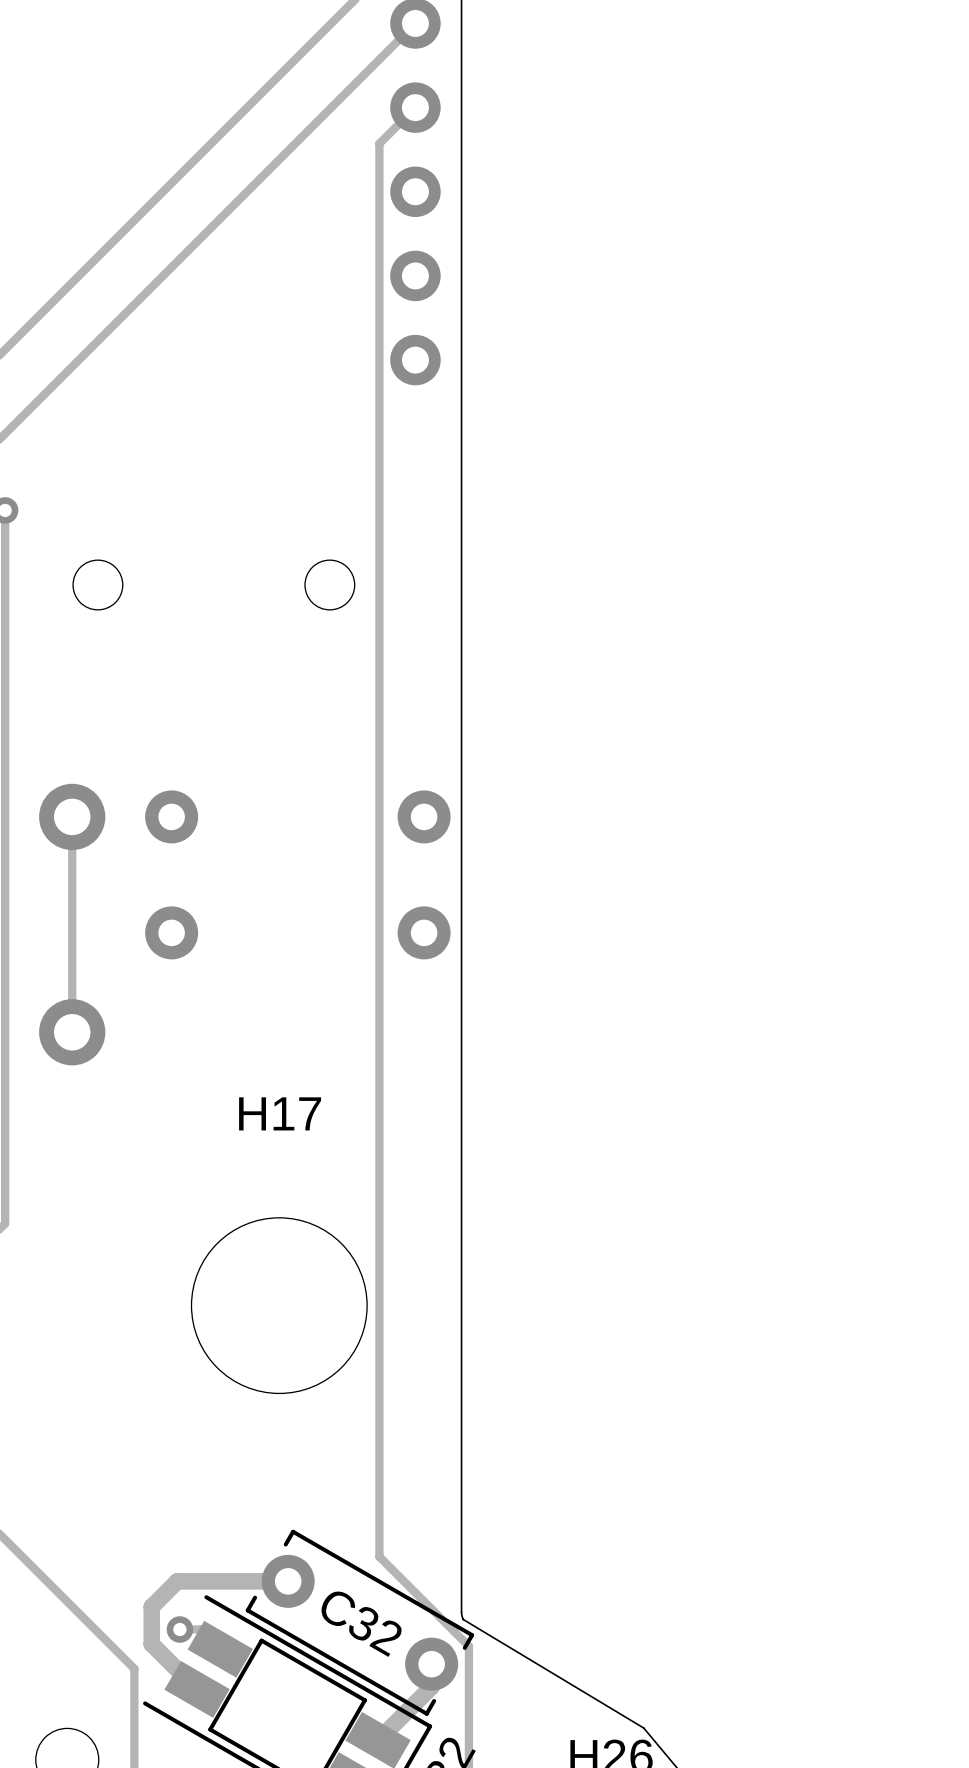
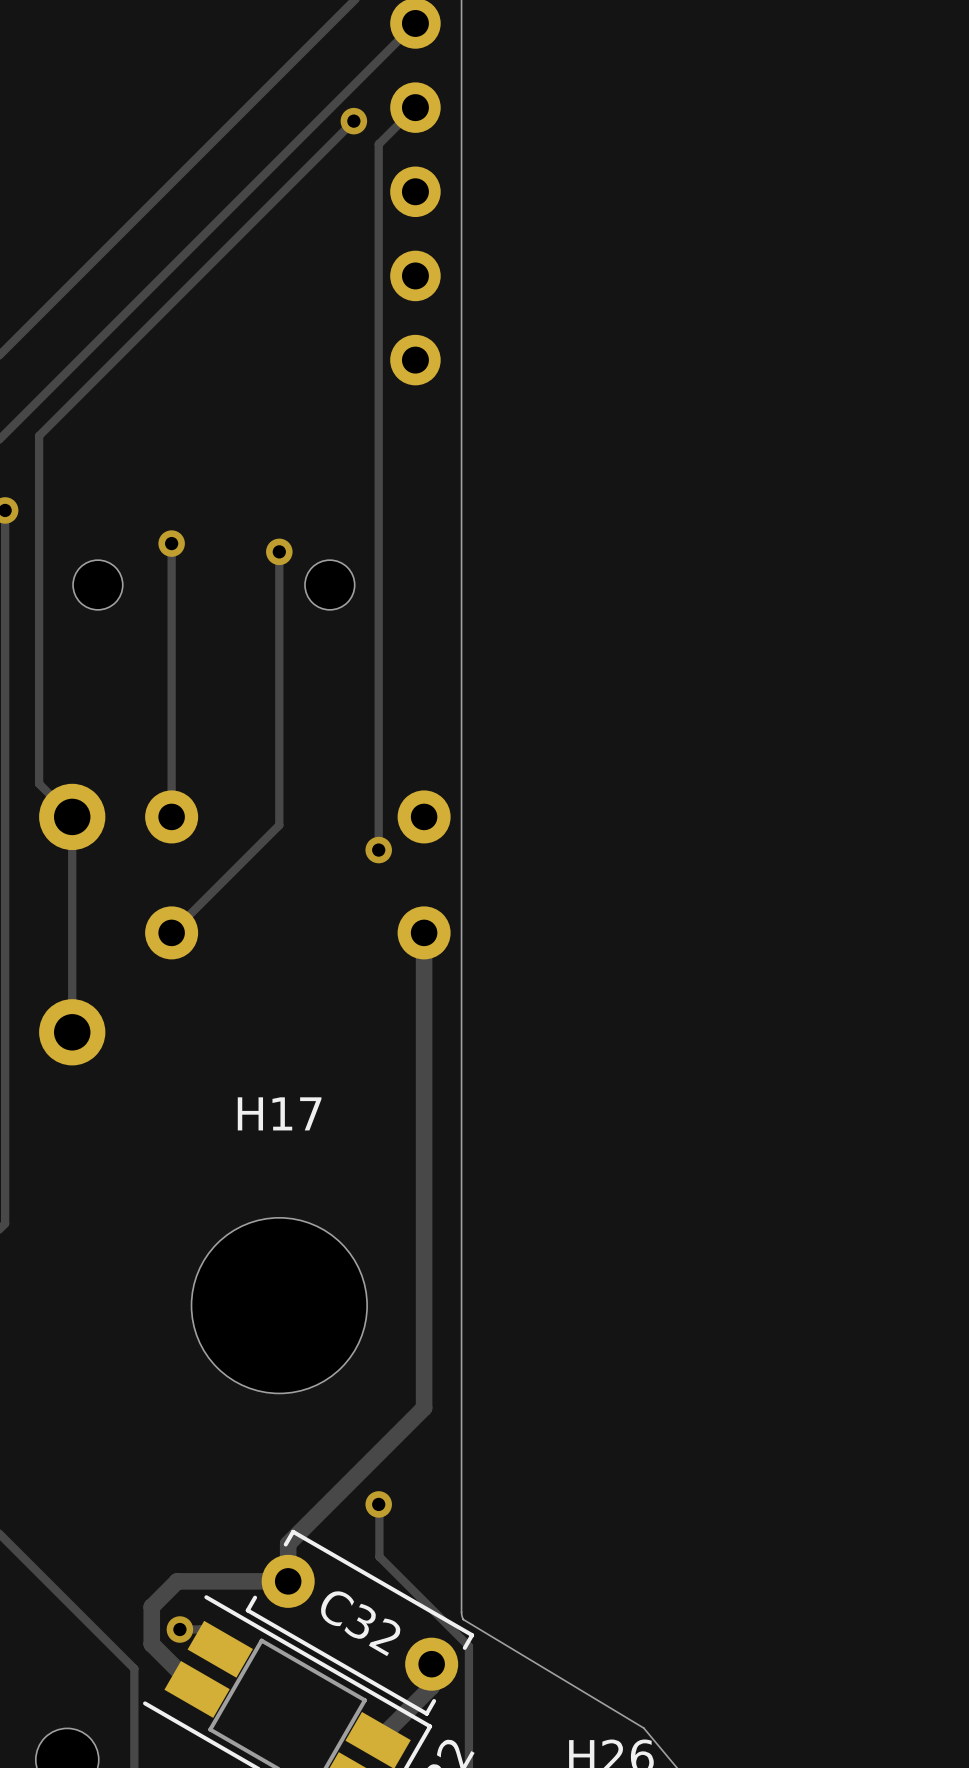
track: none -> (353, 121) (39, 435) (39, 783) (72, 816)
via: none -> (353, 121)
track: (379, 143) (379, 1505) -> (379, 143) (378, 850)
track: none -> (171, 543) (171, 816)
via: none -> (171, 543)
track: none -> (279, 551) (279, 825) (171, 932)
via: none -> (279, 551)
via: none -> (378, 850)
track: none -> (424, 932) (424, 1407) (288, 1543) (288, 1581)
via: none -> (378, 1504)

